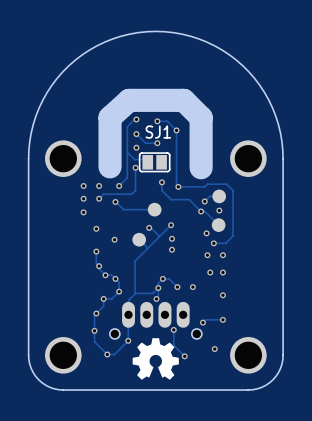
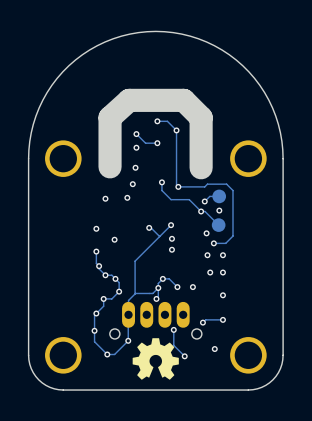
track: (136, 119) (127, 126) (127, 177) (119, 185) -> none
via: (136, 119) -> none
track: (127, 152) (134, 159) (144, 159) (147, 162) -> none
SJ1: (154, 162) -> none
track: (135, 167) (135, 190) (131, 194) (103, 194) (99, 198) -> none
via: none -> (132, 184)
via: (83, 185) -> none
via: (99, 185) -> none
via: (119, 185) -> none
via: none -> (127, 197)
via: (83, 198) -> none
via: (99, 198) -> none
via: none -> (105, 198)
track: (115, 201) (123, 209) (154, 209) -> none
via: (115, 201) -> none
part: (154, 209) -> none
via: (83, 212) -> none
track: (139, 239) (147, 248) -> none
part: (139, 239) -> none

